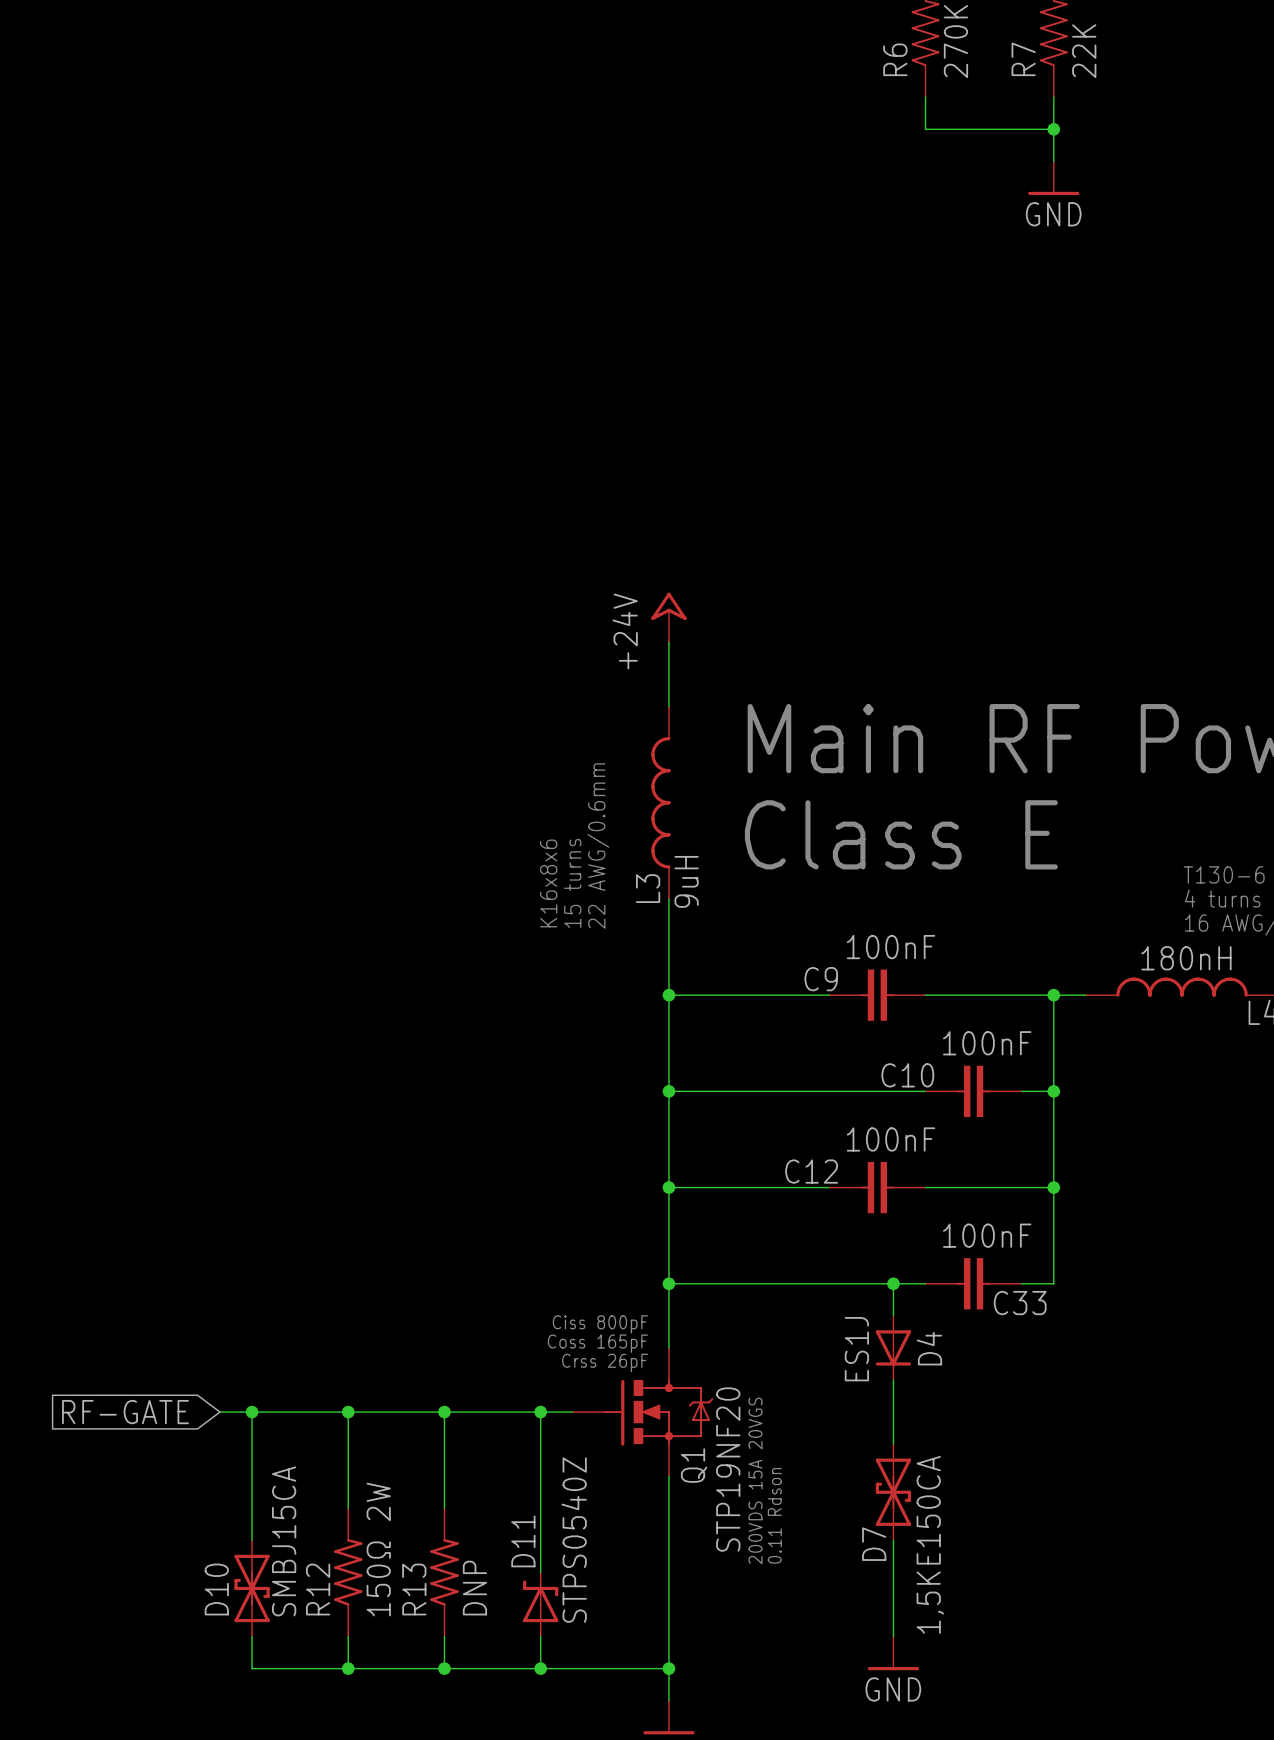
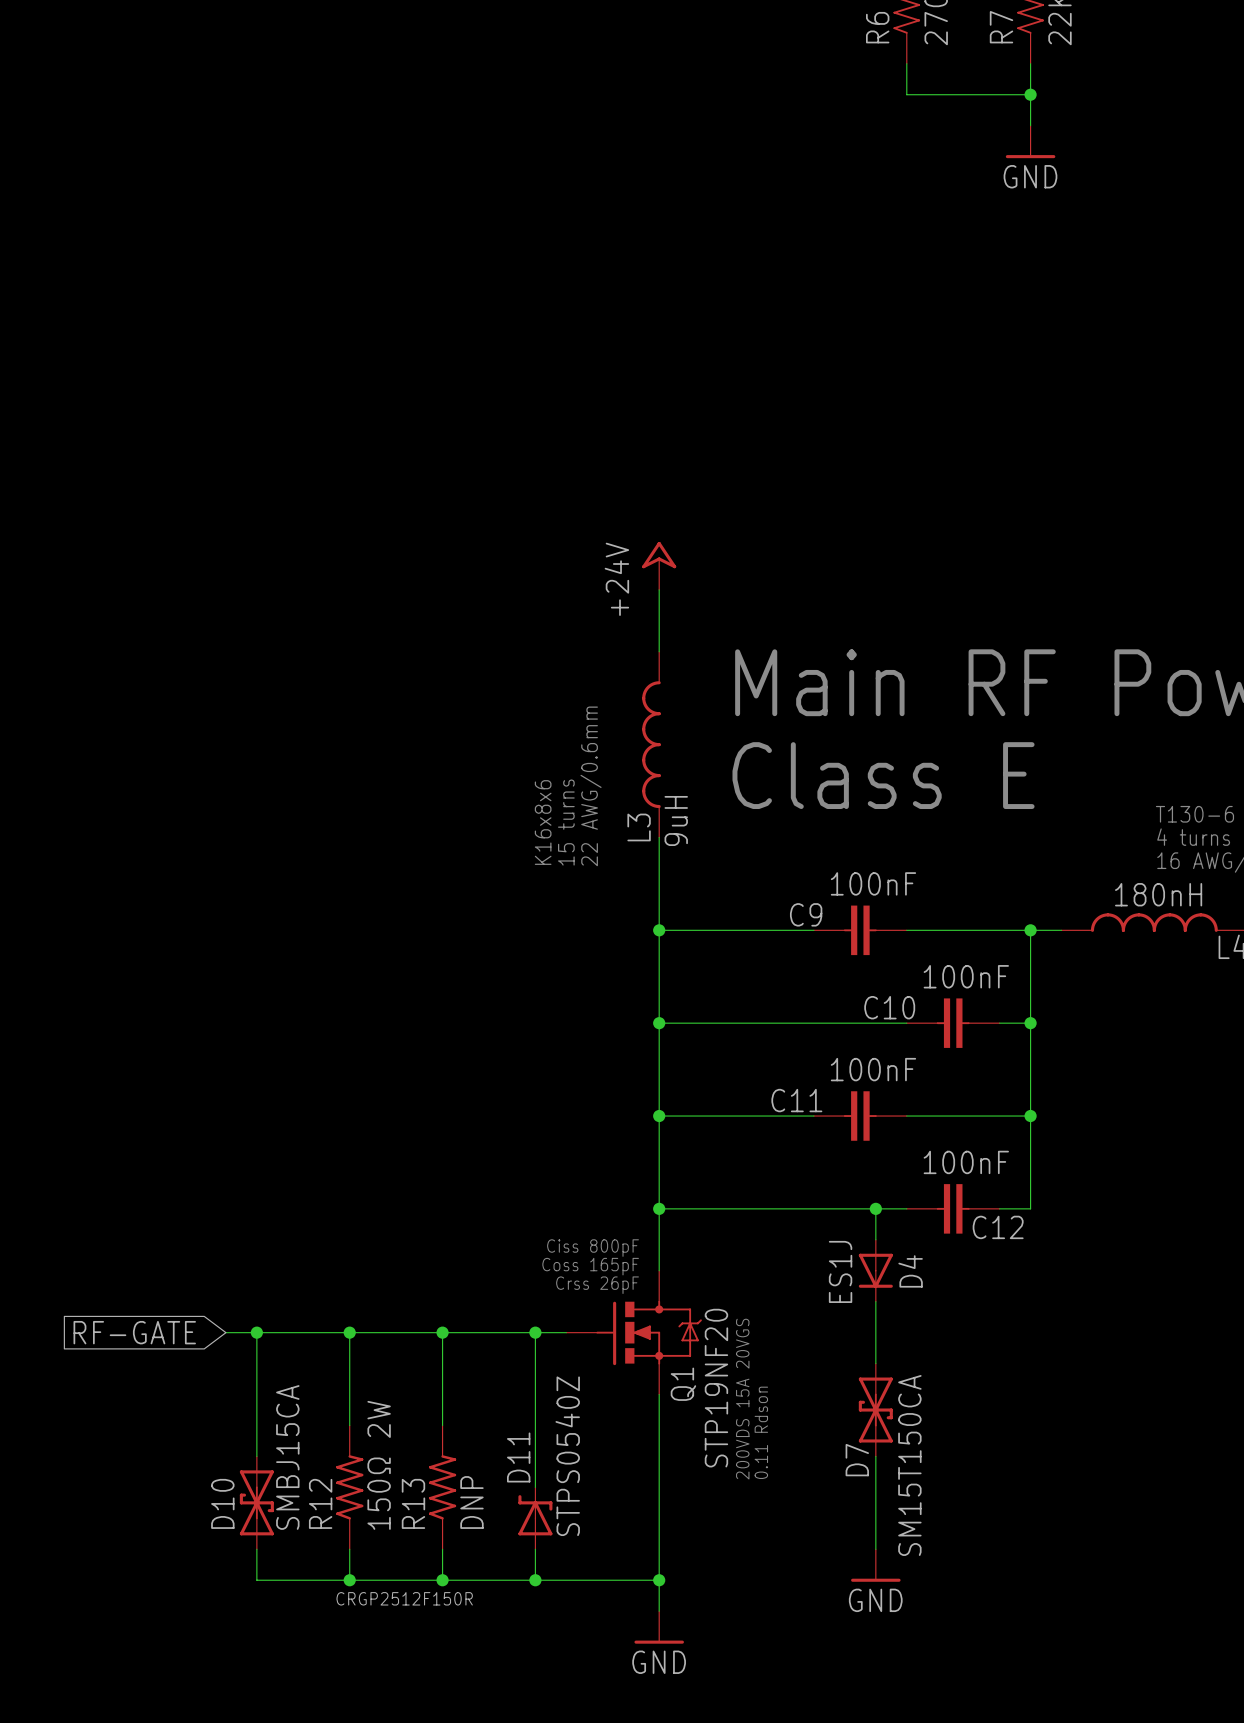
C12 name: C12 (811, 1171) -> C11 (796, 1100)
C33 name: C33 (1020, 1303) -> C12 (998, 1227)
D7 value: 1,5KE150CA (930, 1544) -> SM15T150CA (909, 1465)
text: none -> CRGP2512F150R (404, 1598)

